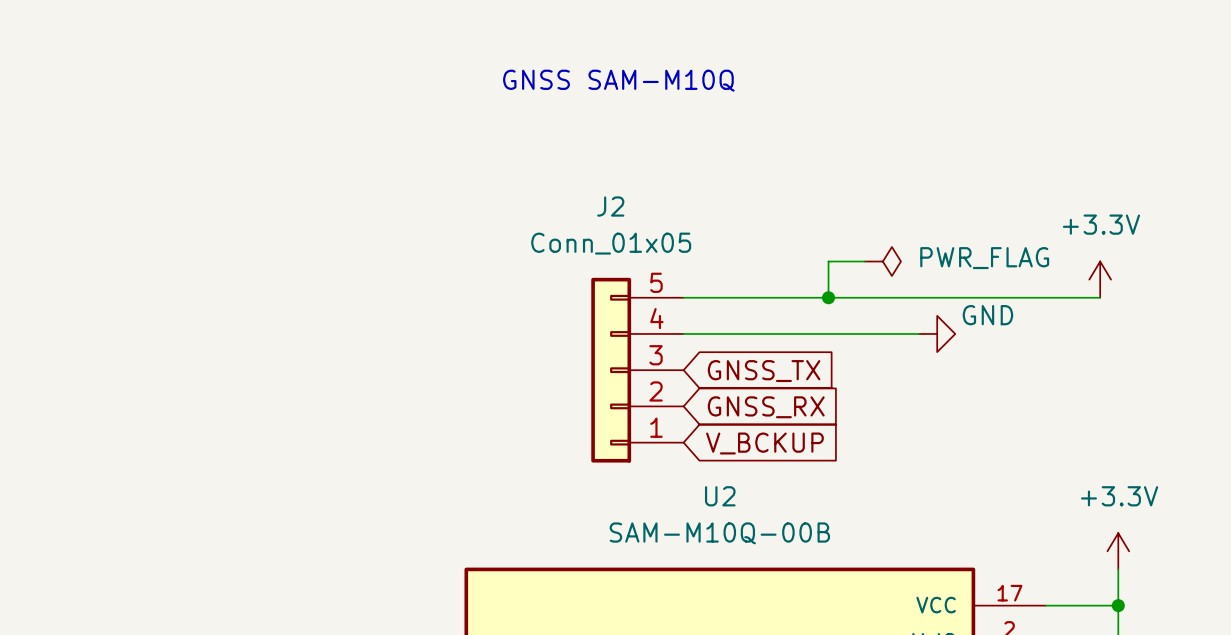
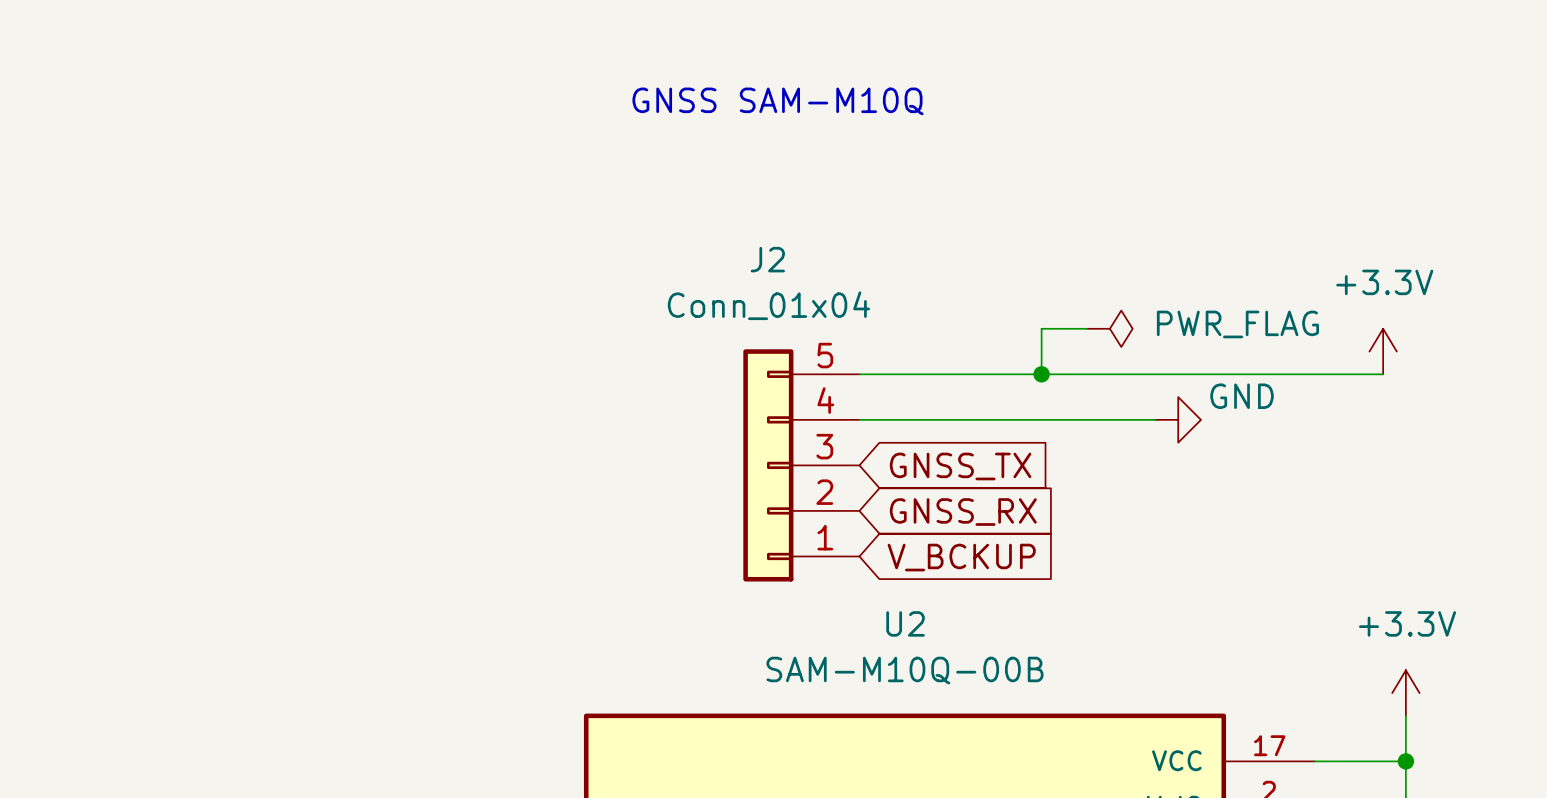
J2 value: Conn_01x05 (611, 243) -> Conn_01x04 (768, 305)

